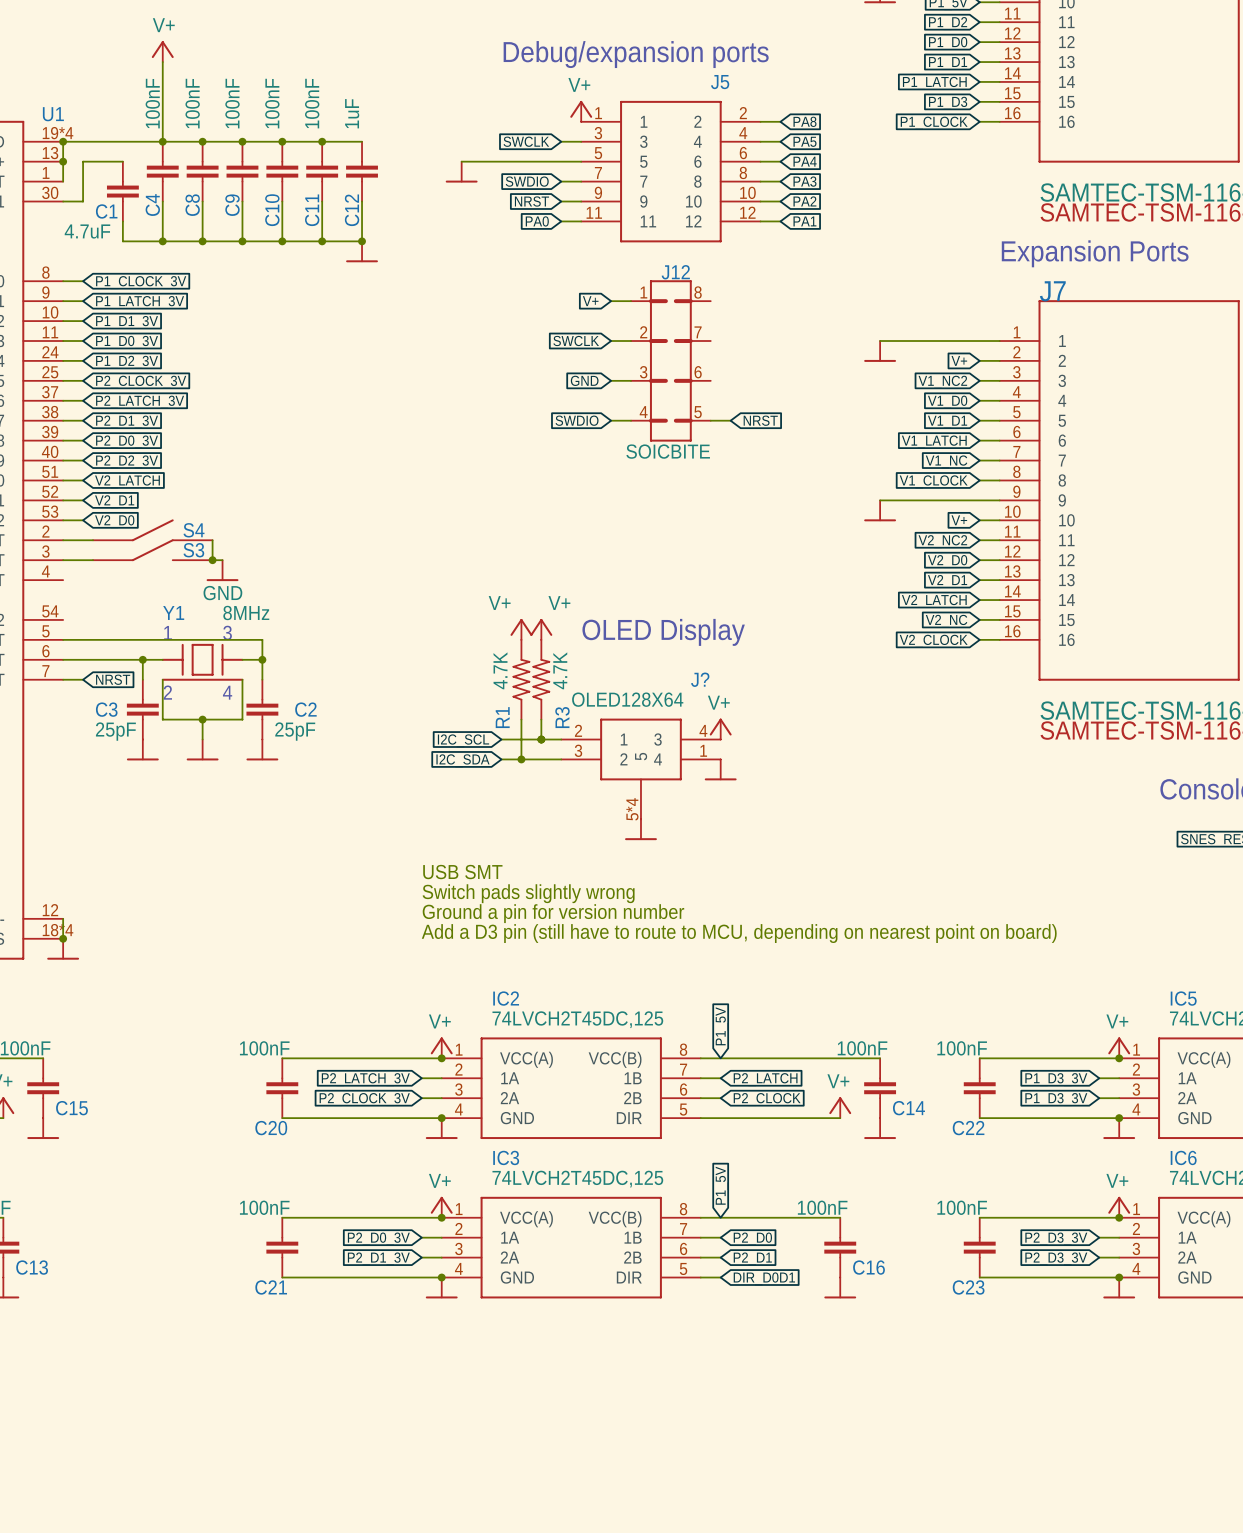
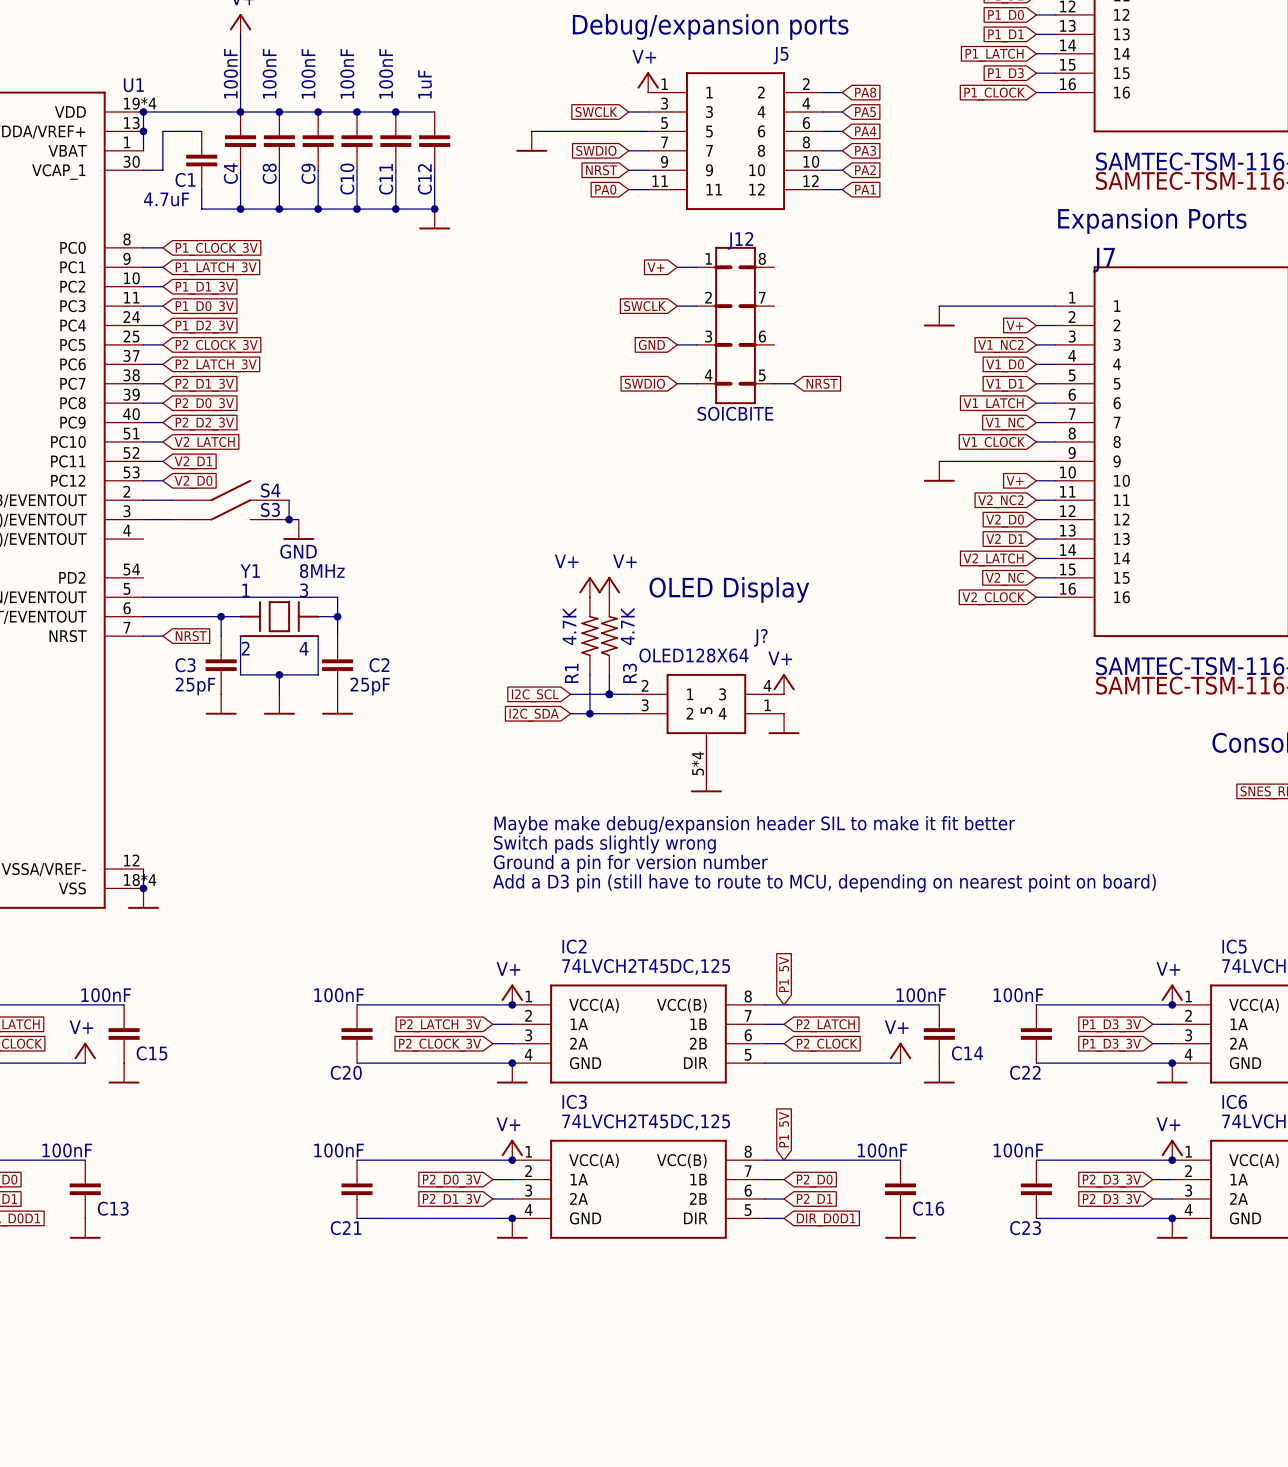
text: USB SMT (462, 872) -> Maybe make debug/expansion header SIL to make it fit better (754, 825)

